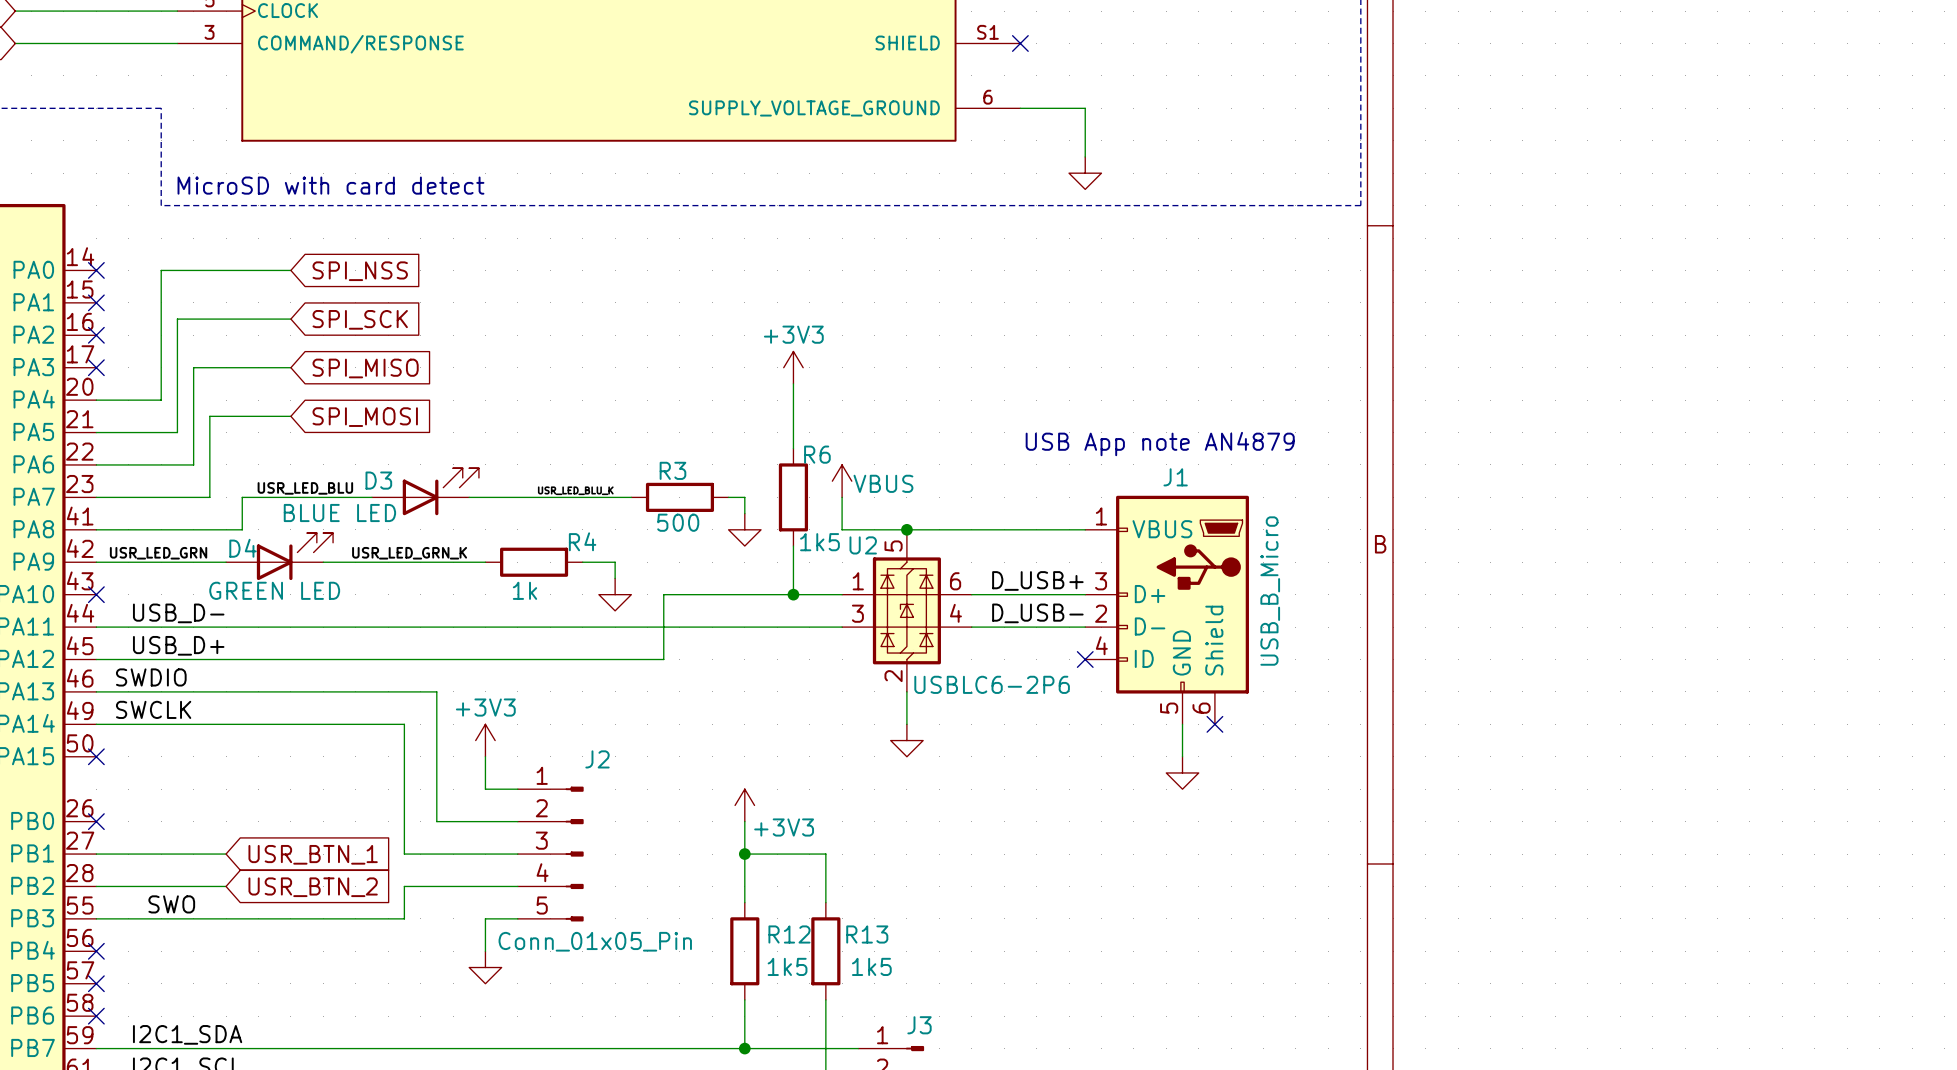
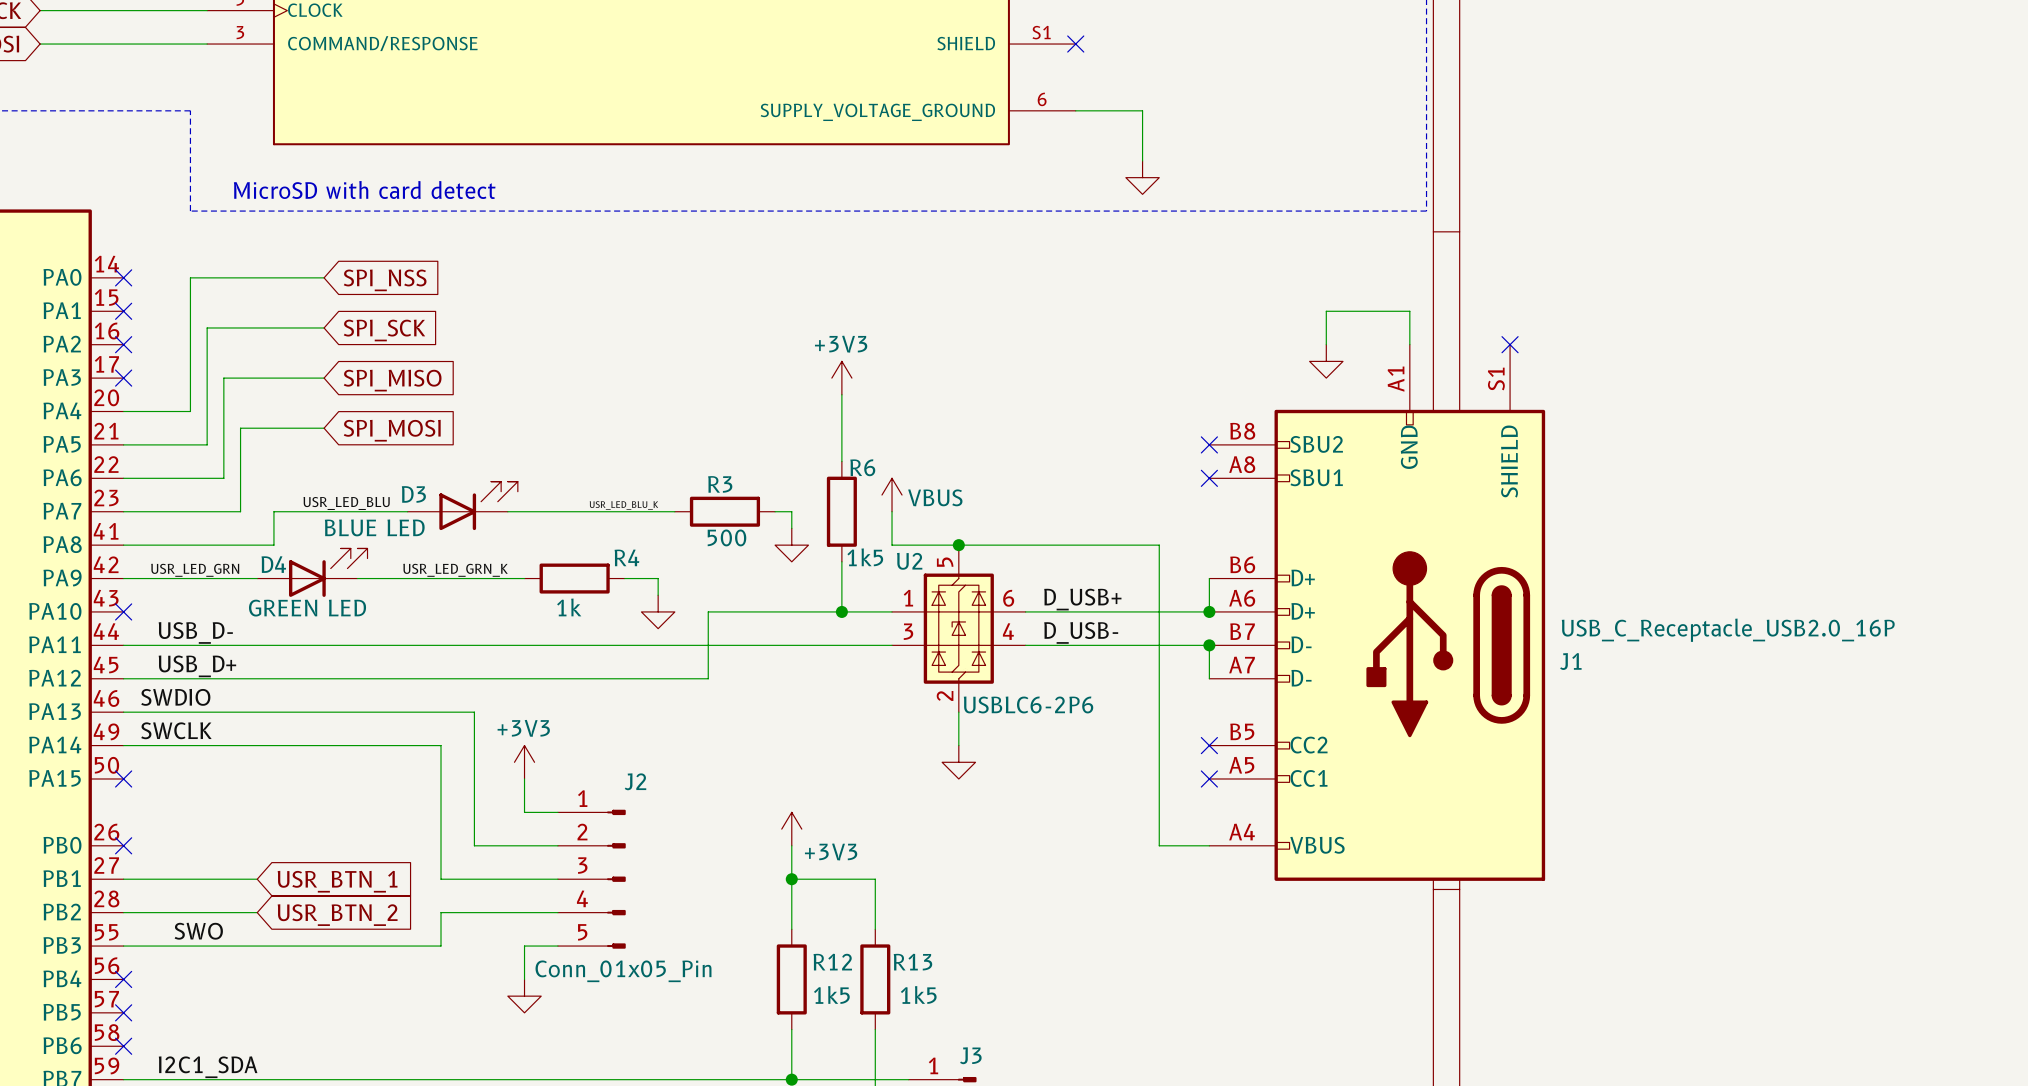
wire: none -> (1326, 344) (1326, 311) (1409, 311) (1409, 344)
no-connect mark: none -> (1510, 344)
power symbol: none -> (1326, 361)
no-connect mark: none -> (1209, 444)
text: USB App note AN4879 (1160, 444) -> none
no-connect mark: none -> (1209, 478)
J1 name position: J1 (1175, 477) -> J1 (1570, 661)
J1 symbol: [1085, 495, 1249, 725] -> [1209, 344, 1546, 881]
wire: none -> (1142, 545) (1159, 545) (1159, 845) (1209, 845)
J1 value: USB_B_Micro (1270, 591) -> USB_C_Receptacle_USB2.0_16P (1728, 630)
junction: none -> (1209, 611)
junction: none -> (1209, 645)
no-connect mark: (1085, 659) -> none
no-connect mark: none -> (1209, 745)
wire: (1182, 724) (1182, 756) -> none
no-connect mark: (1214, 724) -> none
no-connect mark: none -> (1209, 778)
power symbol: (1182, 772) -> none

